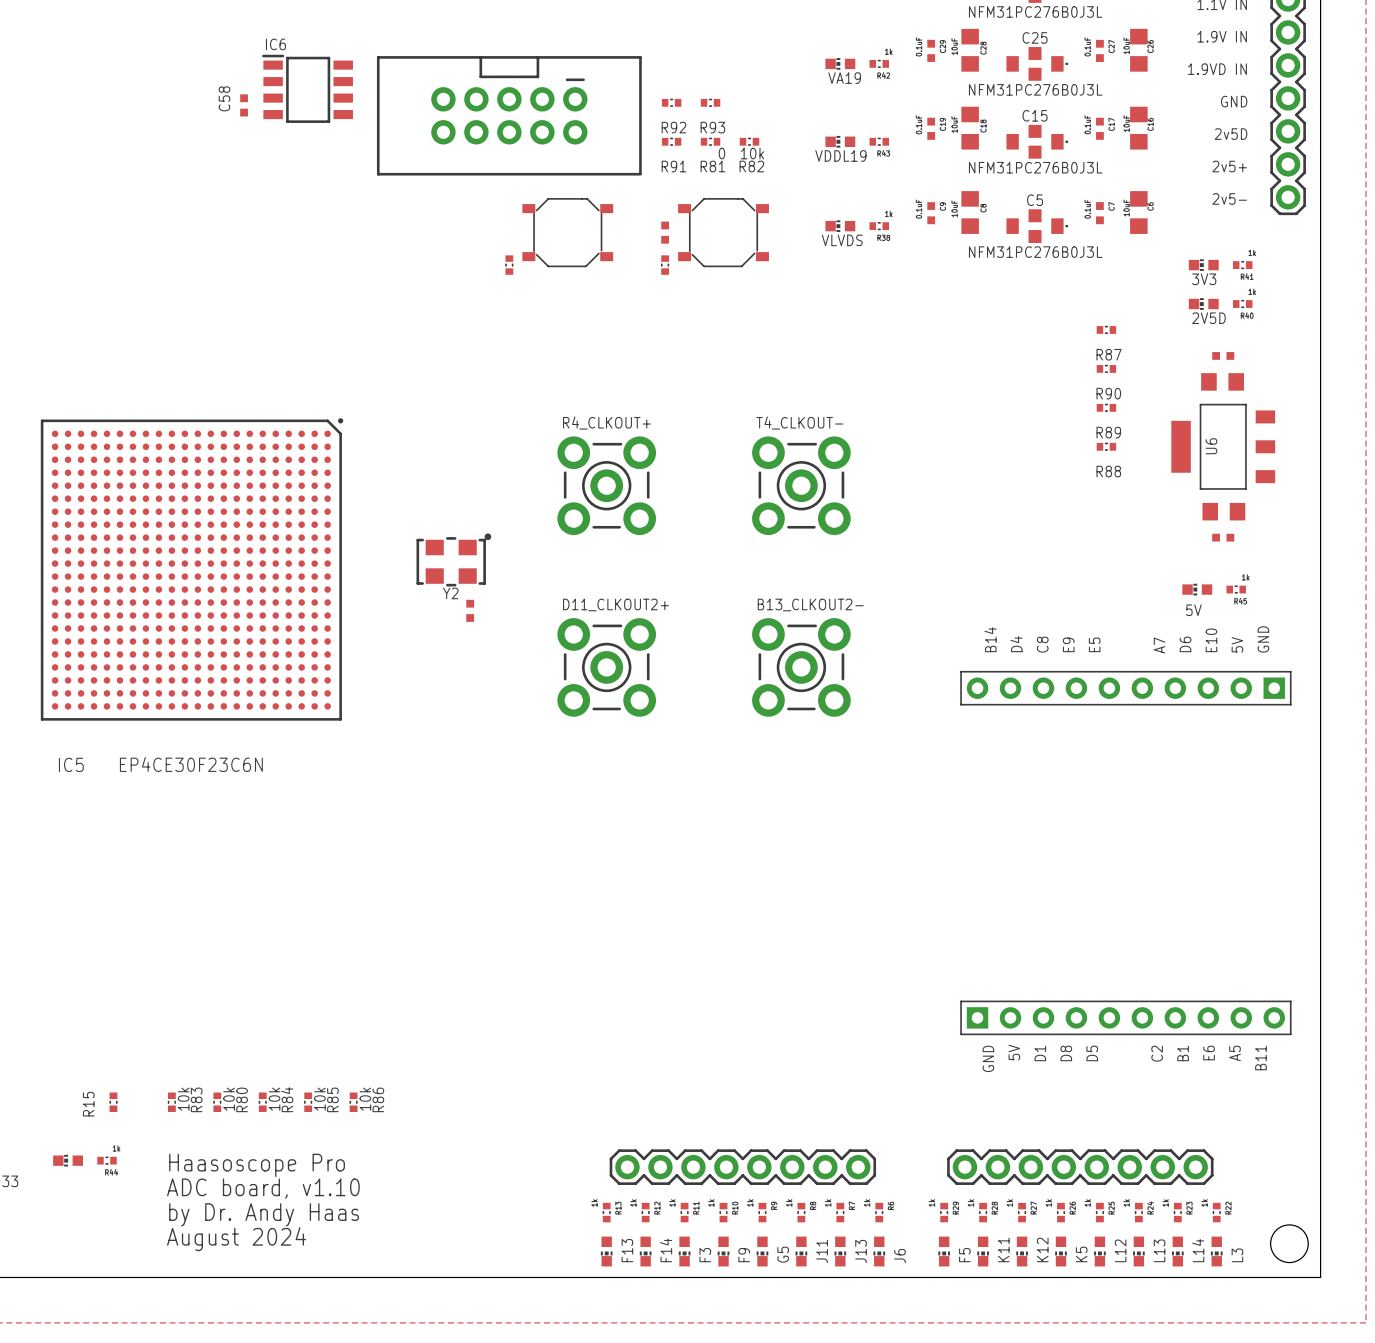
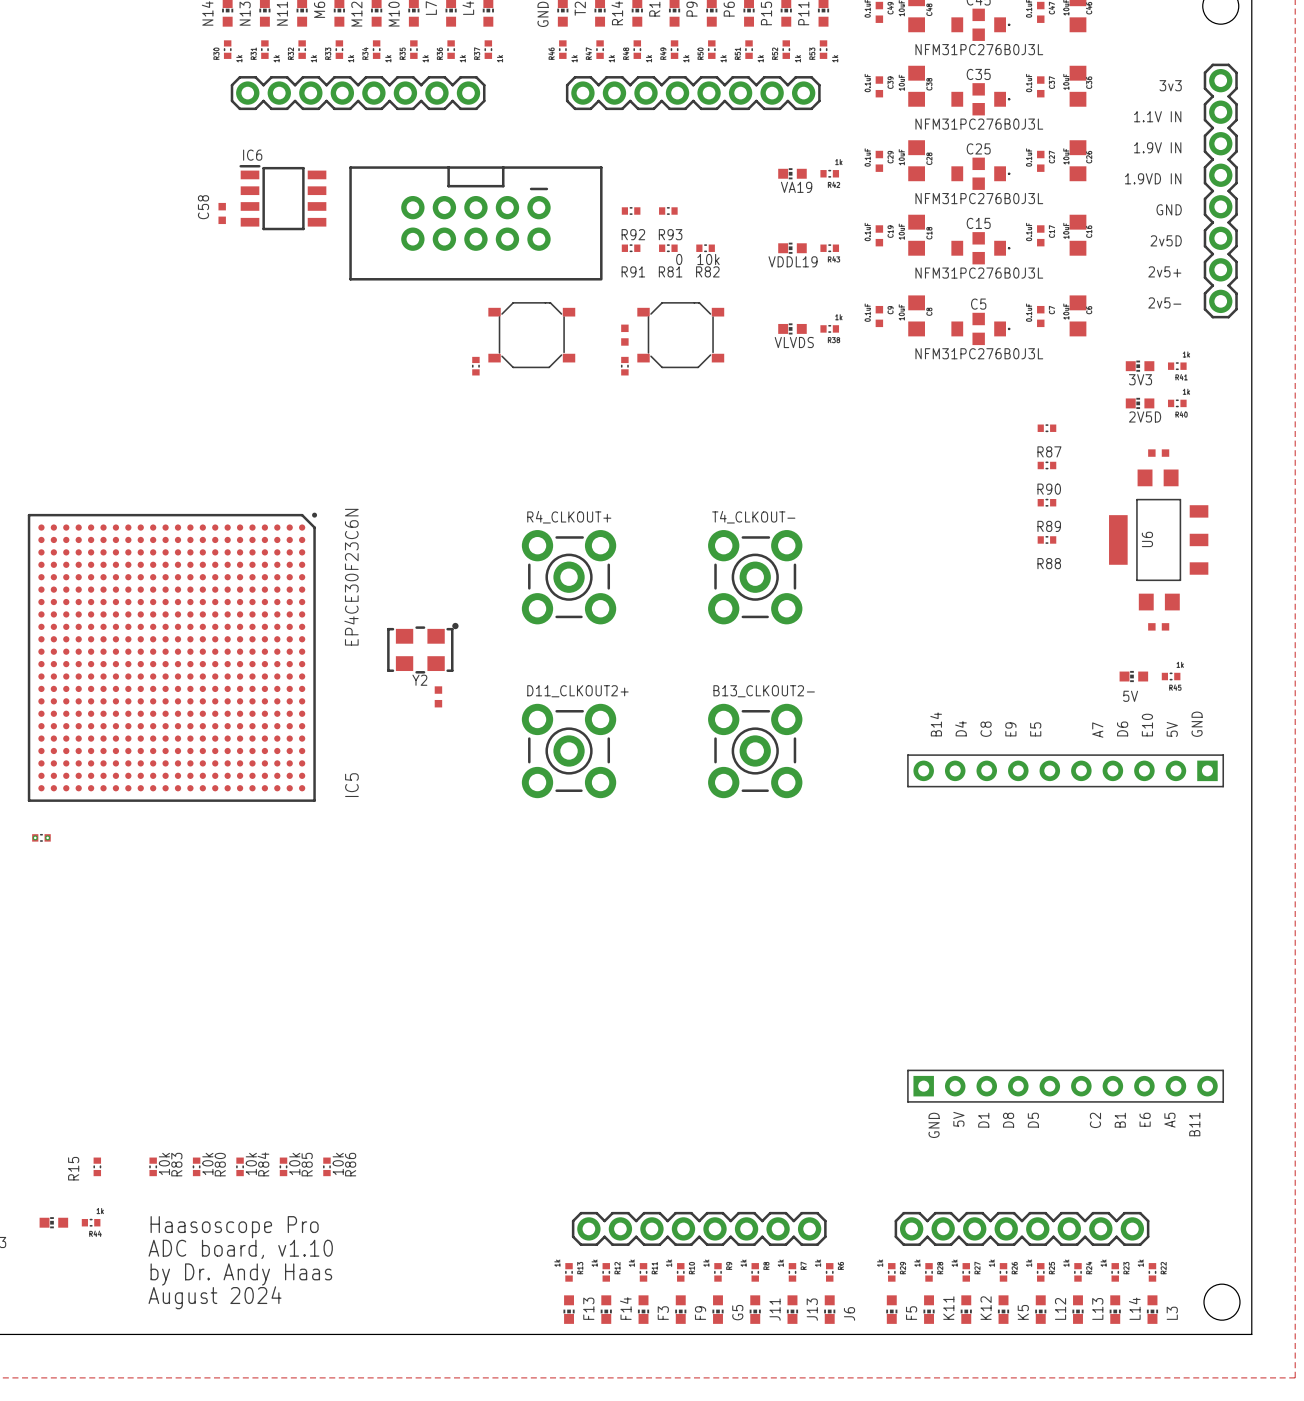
via: none -> (35, 837)
part: none -> (41, 837)
via: none -> (47, 837)
IC5 name rotation: 0° (71, 764) -> 90° counterclockwise (351, 785)
IC5 name position: IC5 (71, 764) -> IC5 (351, 785)
IC5 value rotation: 0° (191, 764) -> 90° counterclockwise (351, 577)
IC5 value position: EP4CE30F23C6N (191, 764) -> EP4CE30F23C6N (351, 577)

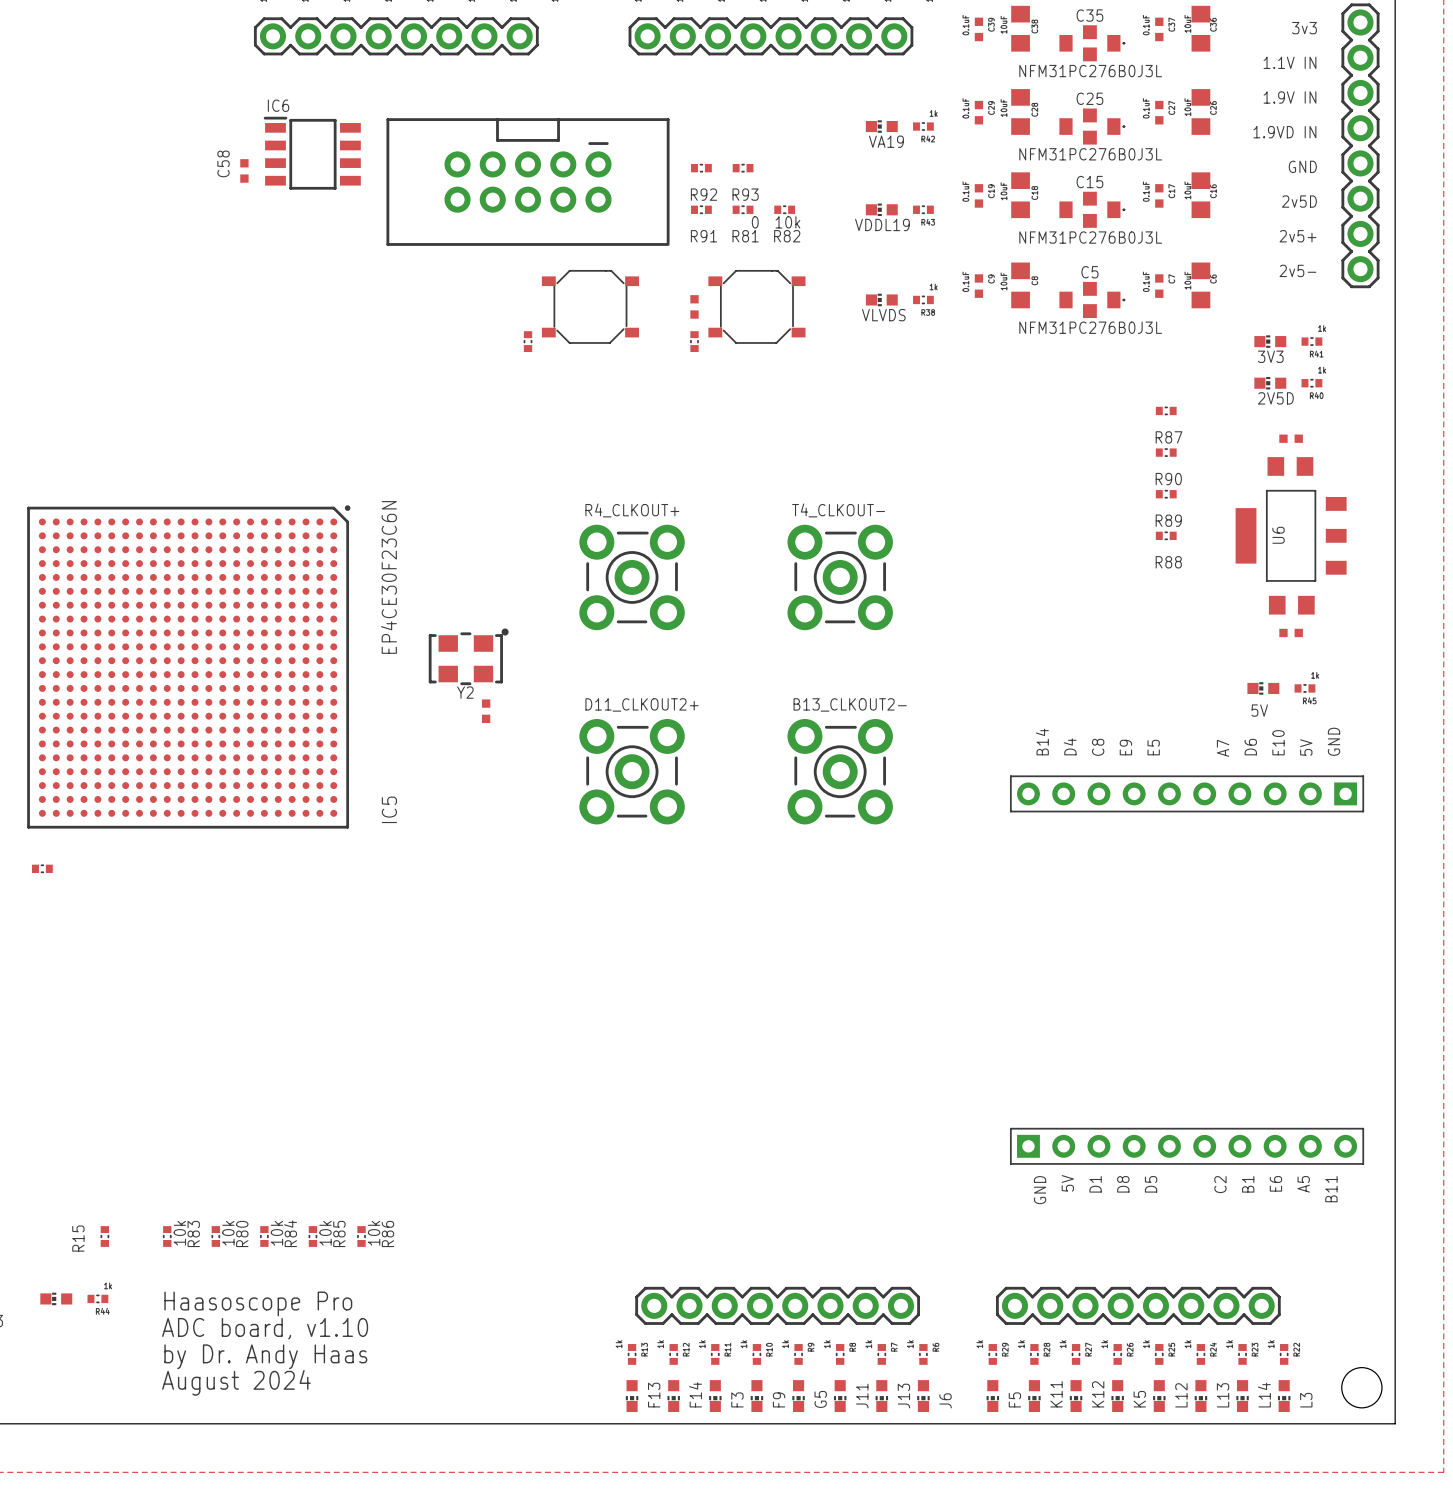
via: (35, 837) -> none
via: (47, 837) -> none

